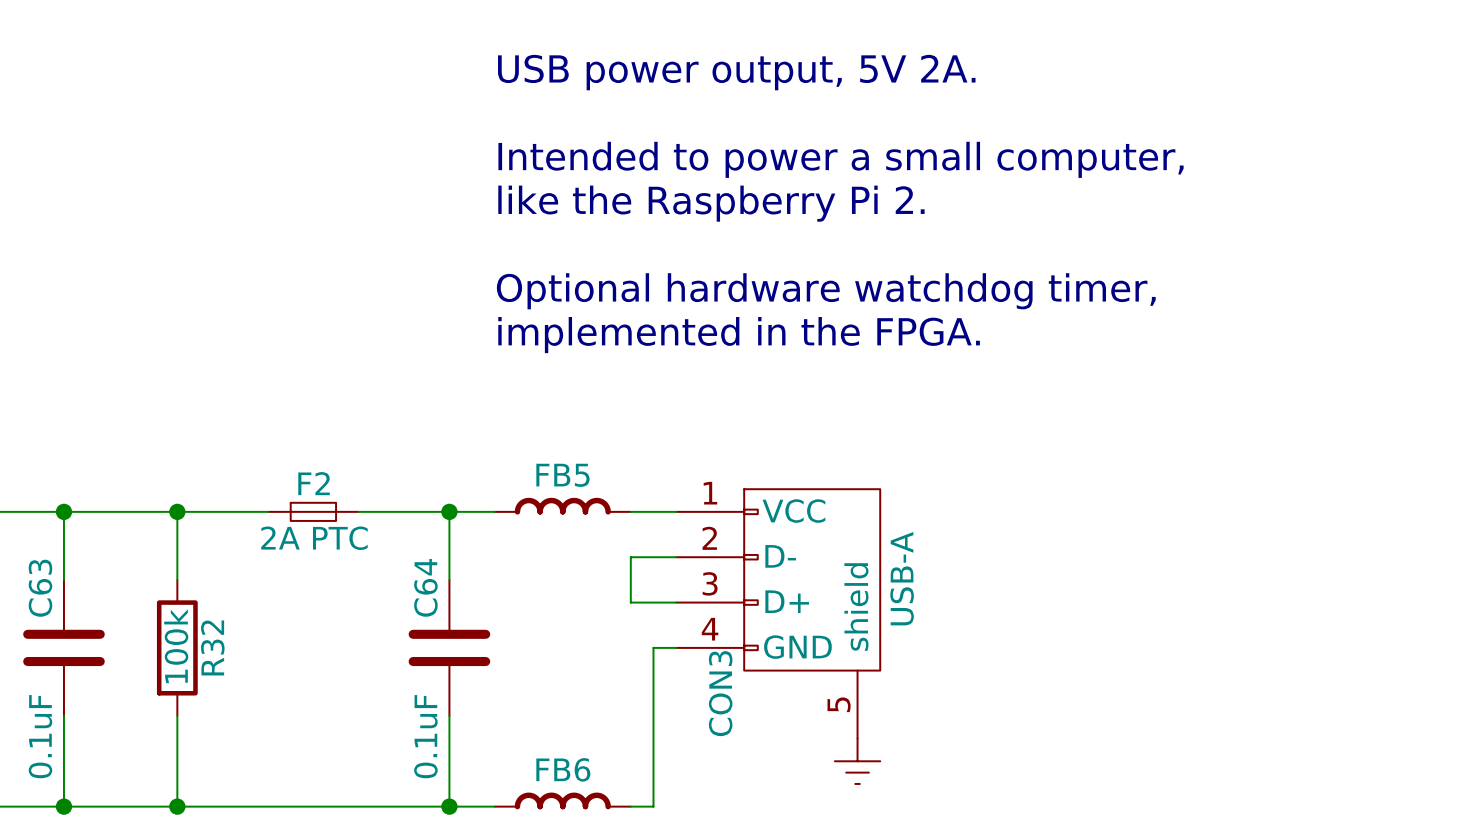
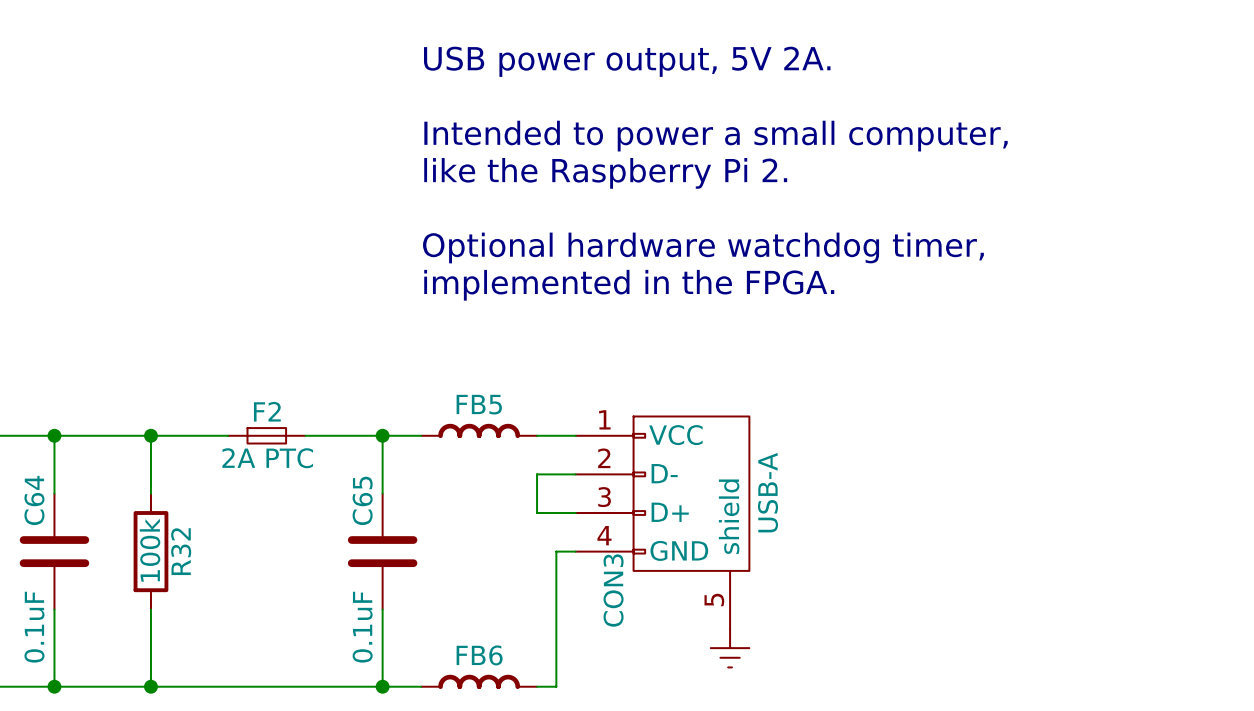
C64 name: C64 (425, 587) -> C65 (362, 500)
C63 name: C63 (40, 588) -> C64 (34, 500)

